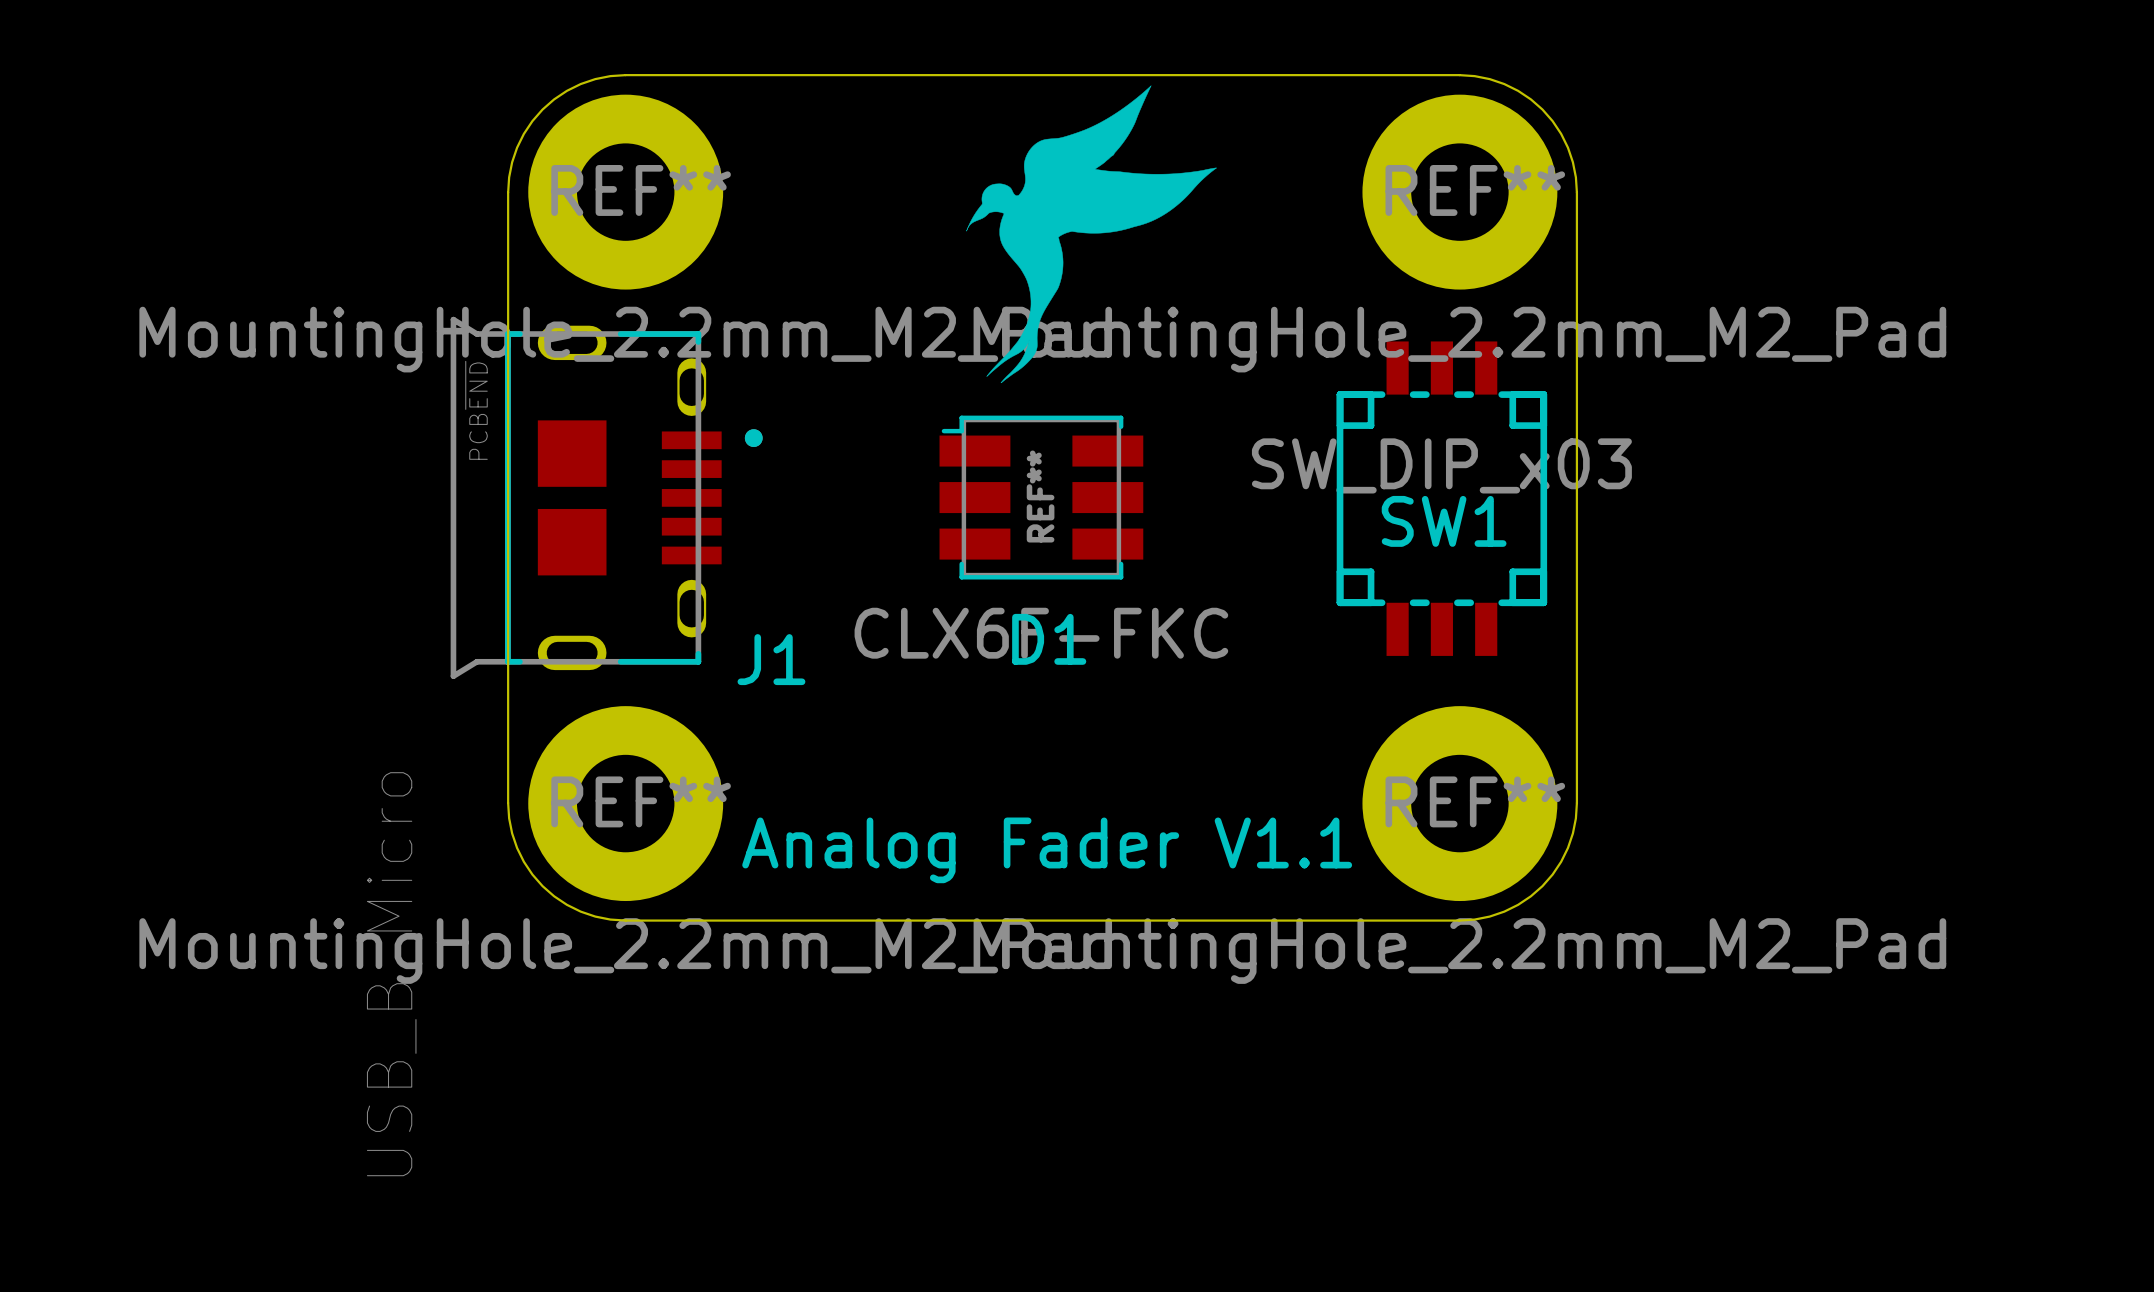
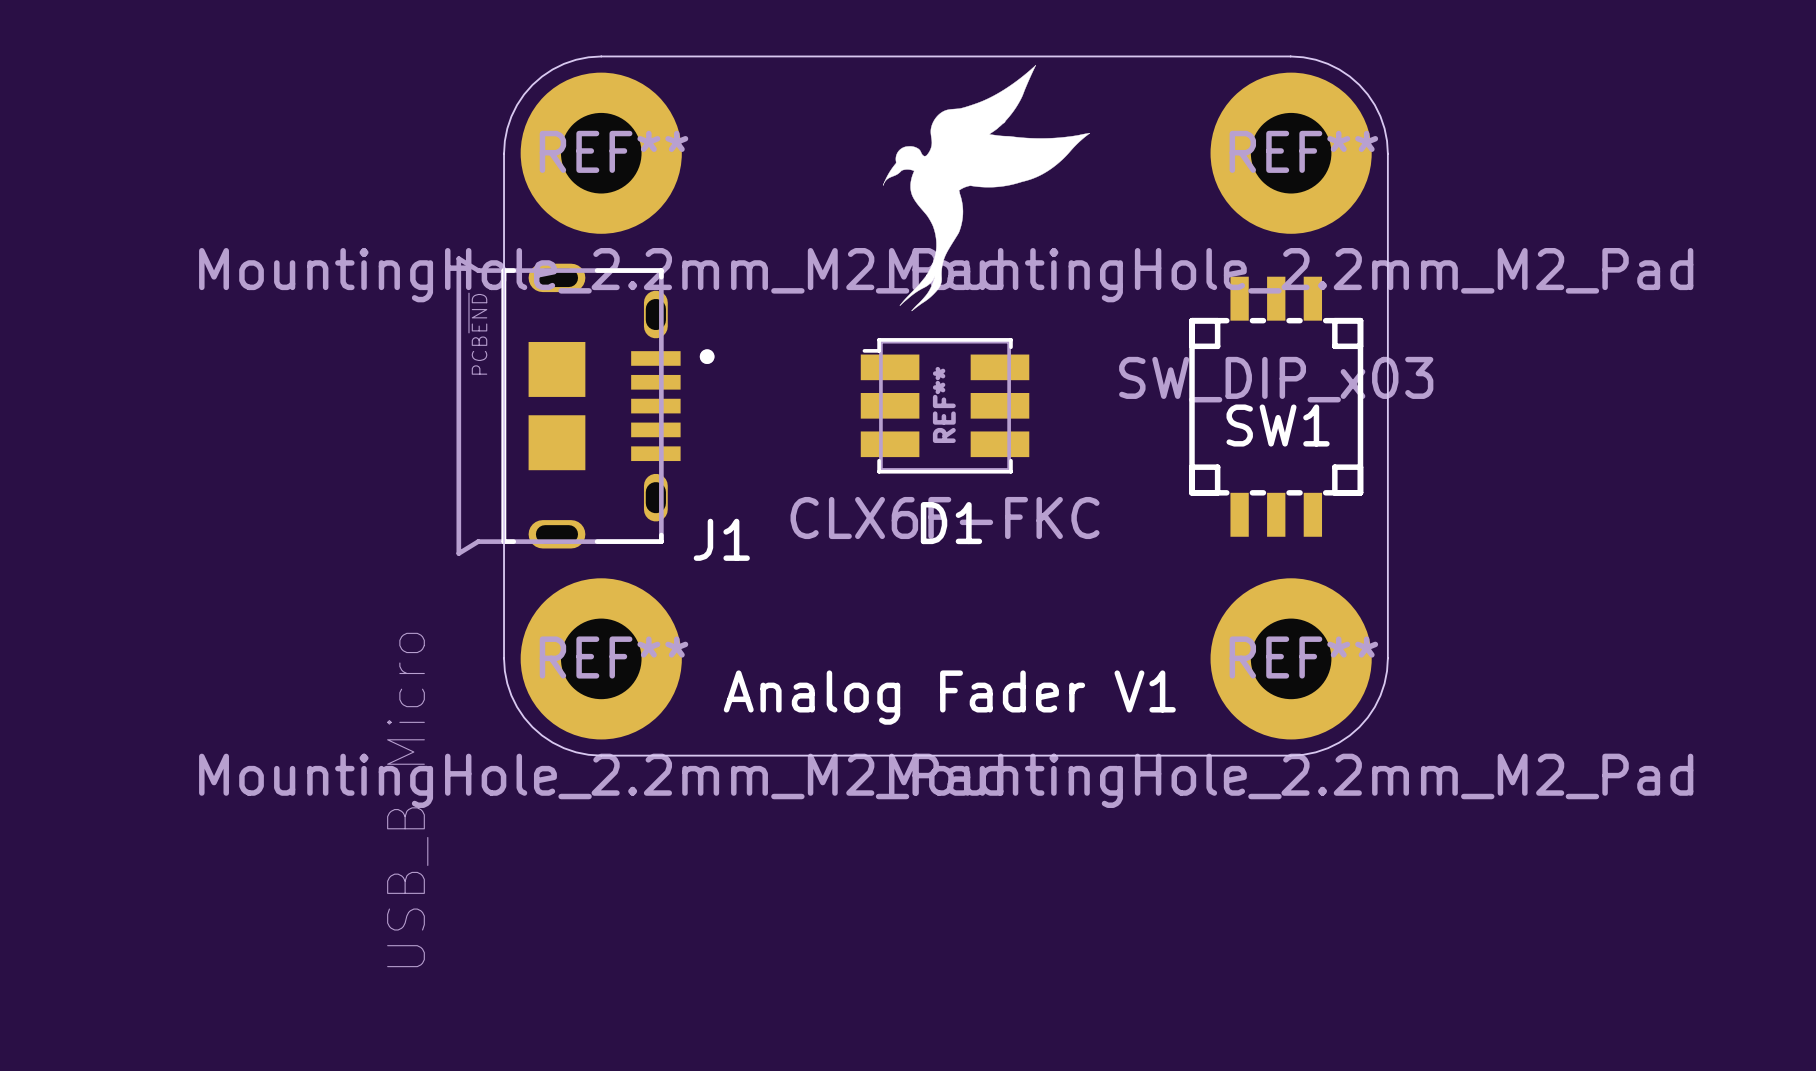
text: Analog Fader V1.1 (1047, 850) -> Analog Fader V1 (949, 697)

